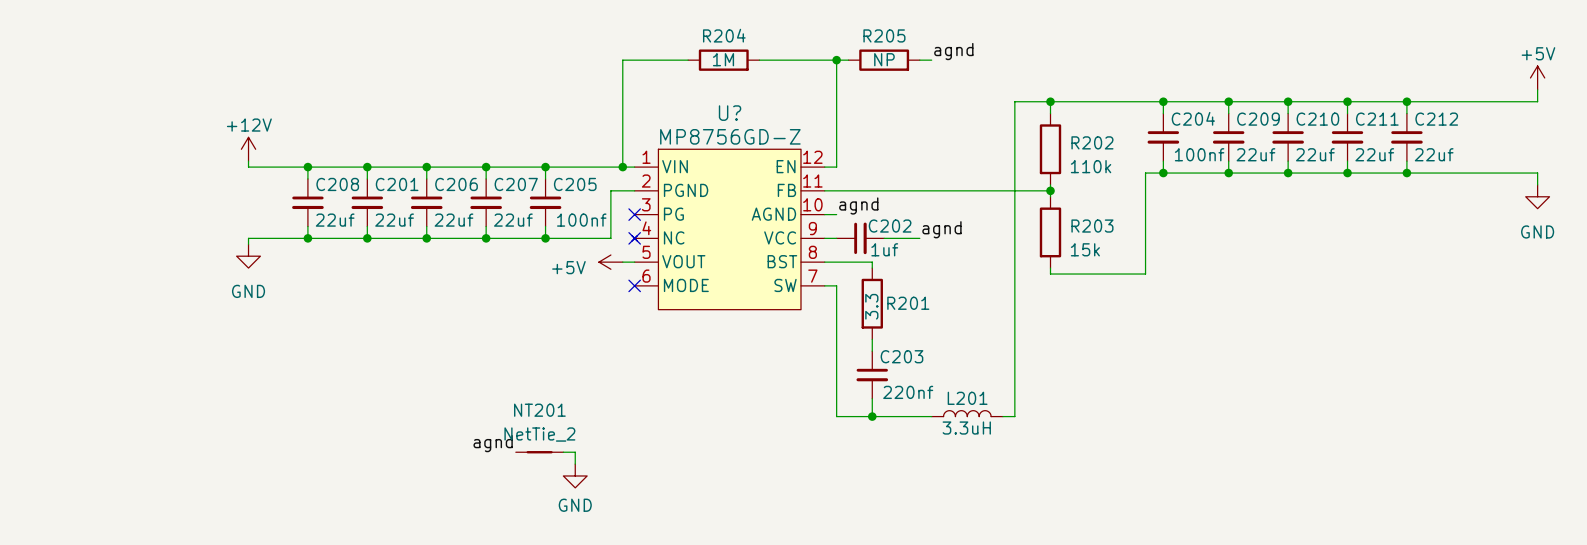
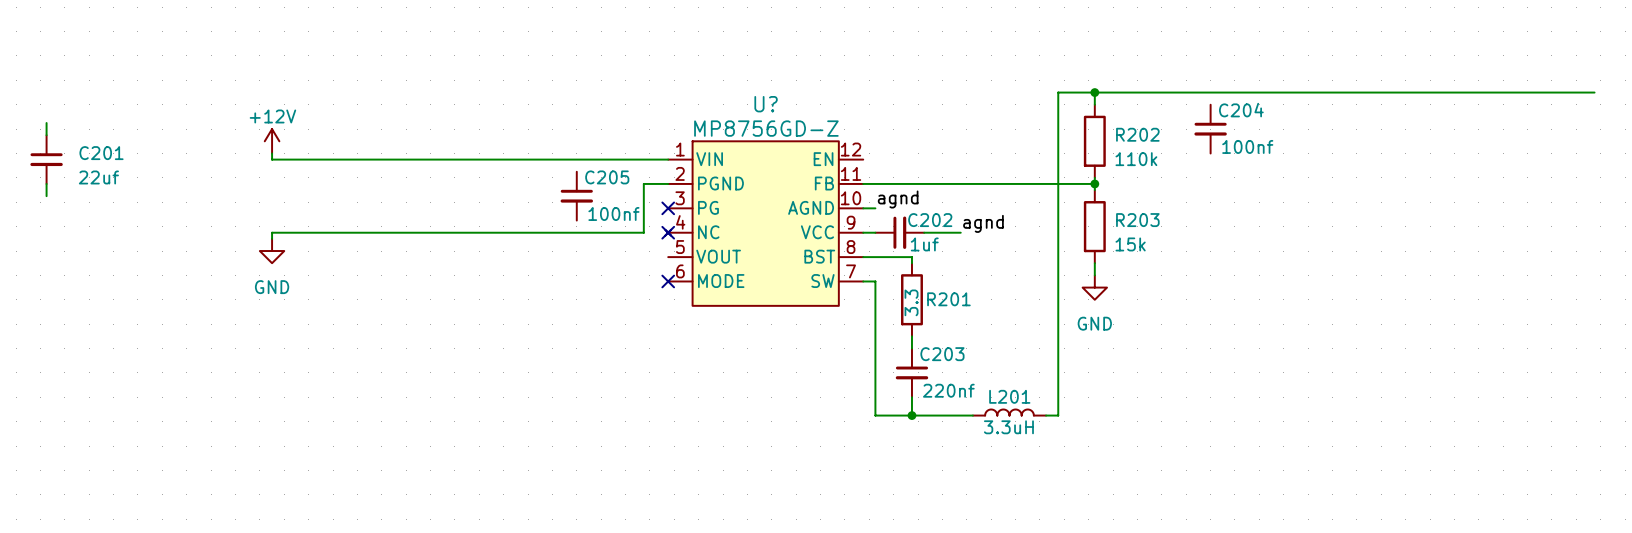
label: agnd (953, 51) -> none
wire: (688, 60) (622, 60) (622, 167) -> none
R204: 1M (723, 60) -> none
wire: (759, 60) (848, 60) -> none
wire: (836, 60) (836, 167) (824, 167) -> none
junction: (836, 60) -> none
R205: NP (884, 60) -> none
wire: (919, 60) (931, 60) -> none
power symbol: +5V (1537, 77) -> none
wire: (1537, 89) (1537, 101) -> none
wire: (1163, 101) (1163, 113) -> none
junction: (1163, 101) -> none
wire: (1228, 101) (1228, 113) -> none
junction: (1228, 101) -> none
wire: (1288, 101) (1288, 113) -> none
junction: (1288, 101) -> none
wire: (1347, 101) (1347, 113) -> none
junction: (1347, 101) -> none
wire: (1406, 101) (1406, 113) -> none
junction: (1406, 101) -> none
wire: none -> (46, 123) (46, 135)
C209: 22uf (1228, 137) -> none
C210: 22uf (1288, 137) -> none
C211: 22uf (1347, 137) -> none
C212: 22uf (1406, 137) -> none
wire: (1163, 161) (1163, 173) -> none
wire: (1228, 161) (1228, 173) -> none
wire: (1288, 161) (1288, 173) -> none
wire: (1347, 161) (1347, 173) -> none
wire: (1406, 161) (1406, 173) -> none
wire: (307, 167) (307, 178) -> none
junction: (307, 167) -> none
wire: (367, 167) (367, 178) -> none
junction: (367, 167) -> none
wire: (426, 167) (426, 178) -> none
junction: (426, 167) -> none
wire: (486, 167) (486, 178) -> none
junction: (486, 167) -> none
wire: (545, 167) (545, 178) -> none
junction: (545, 167) -> none
junction: (622, 167) -> none
junction: (1163, 173) -> none
junction: (1228, 173) -> none
junction: (1288, 173) -> none
junction: (1347, 173) -> none
junction: (1406, 173) -> none
C201 name position: C201 (397, 184) -> C201 (101, 153)
wire: (1537, 184) (1537, 173) (1145, 173) (1145, 274) (1050, 274) -> (1094, 275) (1094, 269)
wire: none -> (46, 183) (46, 196)
power symbol: GND (1537, 196) -> none
C208: 22uf (307, 202) -> none
C201 position: (367, 202) -> (46, 159)
C206: 22uf (426, 202) -> none
C207: 22uf (486, 202) -> none
C201 value position: 22uf (394, 220) -> 22uf (98, 177)
wire: (307, 226) (307, 238) -> none
wire: (367, 226) (367, 238) -> none
wire: (426, 226) (426, 238) -> none
wire: (486, 226) (486, 238) -> none
wire: (545, 226) (545, 238) -> none
junction: (307, 238) -> none
junction: (367, 238) -> none
junction: (426, 238) -> none
junction: (486, 238) -> none
junction: (545, 238) -> none
power symbol: +5V (610, 262) -> none
wire: (622, 262) (634, 262) -> none
power symbol: none -> GND (1094, 287)
label: agnd (493, 443) -> none
NT201: NetTie_2 (539, 452) -> none
wire: (563, 452) (575, 452) (575, 464) -> none
power symbol: GND (575, 475) -> none

